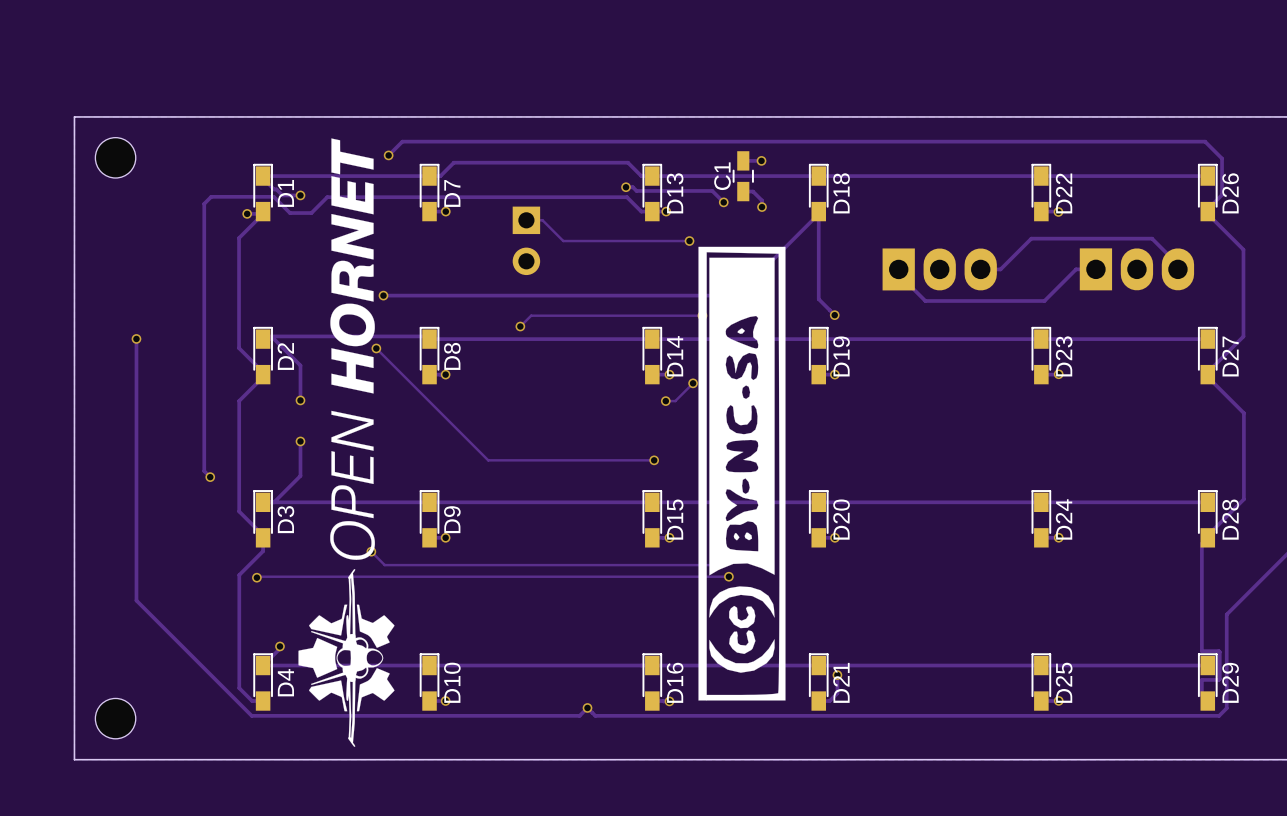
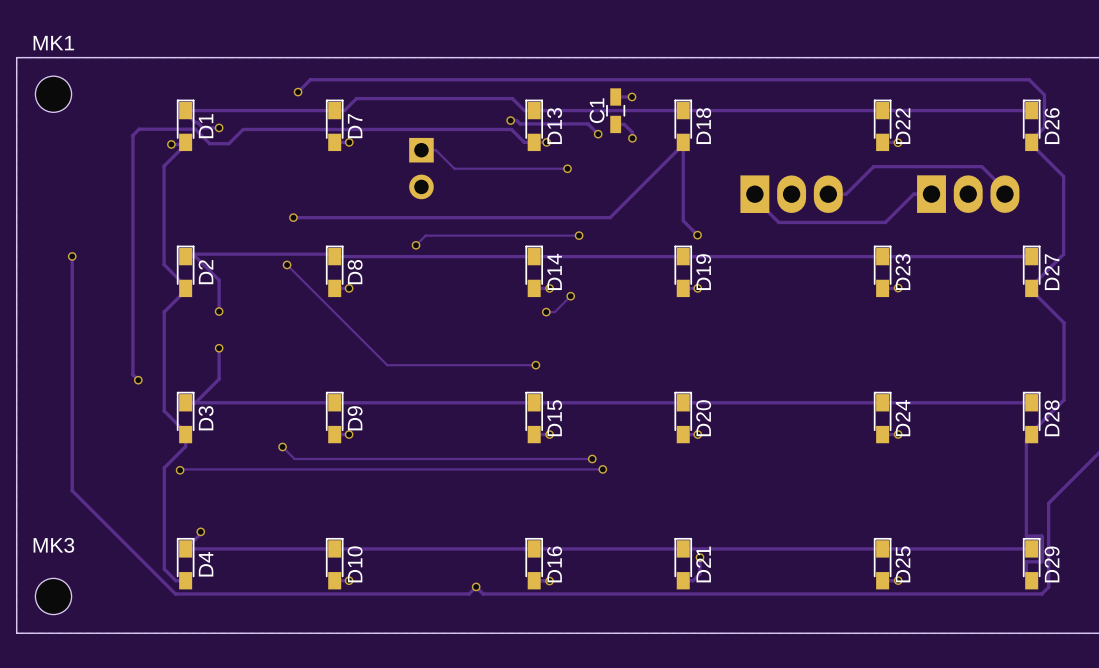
MK1 name: none -> MK1 (53, 43)
drawing: [298, 138, 395, 747] -> none
drawing: [698, 246, 786, 701] -> none
MK3 name: none -> MK3 (53, 545)

